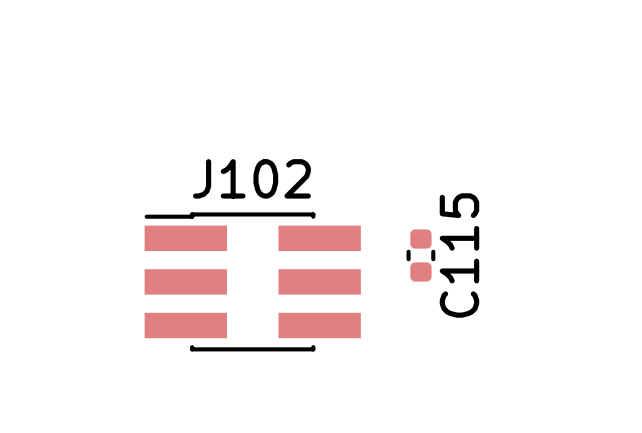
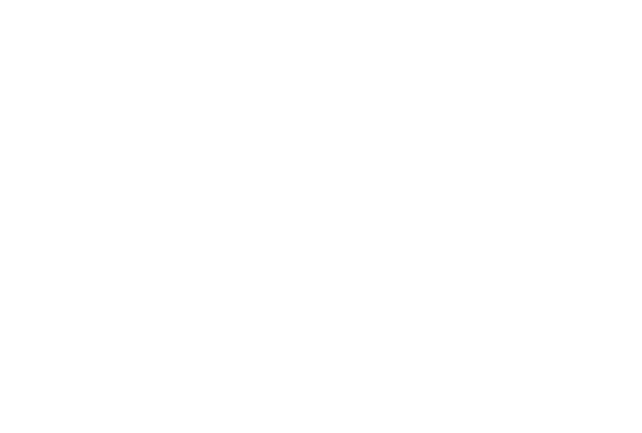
C115: (420, 255) -> none
J102: (252, 281) -> none

